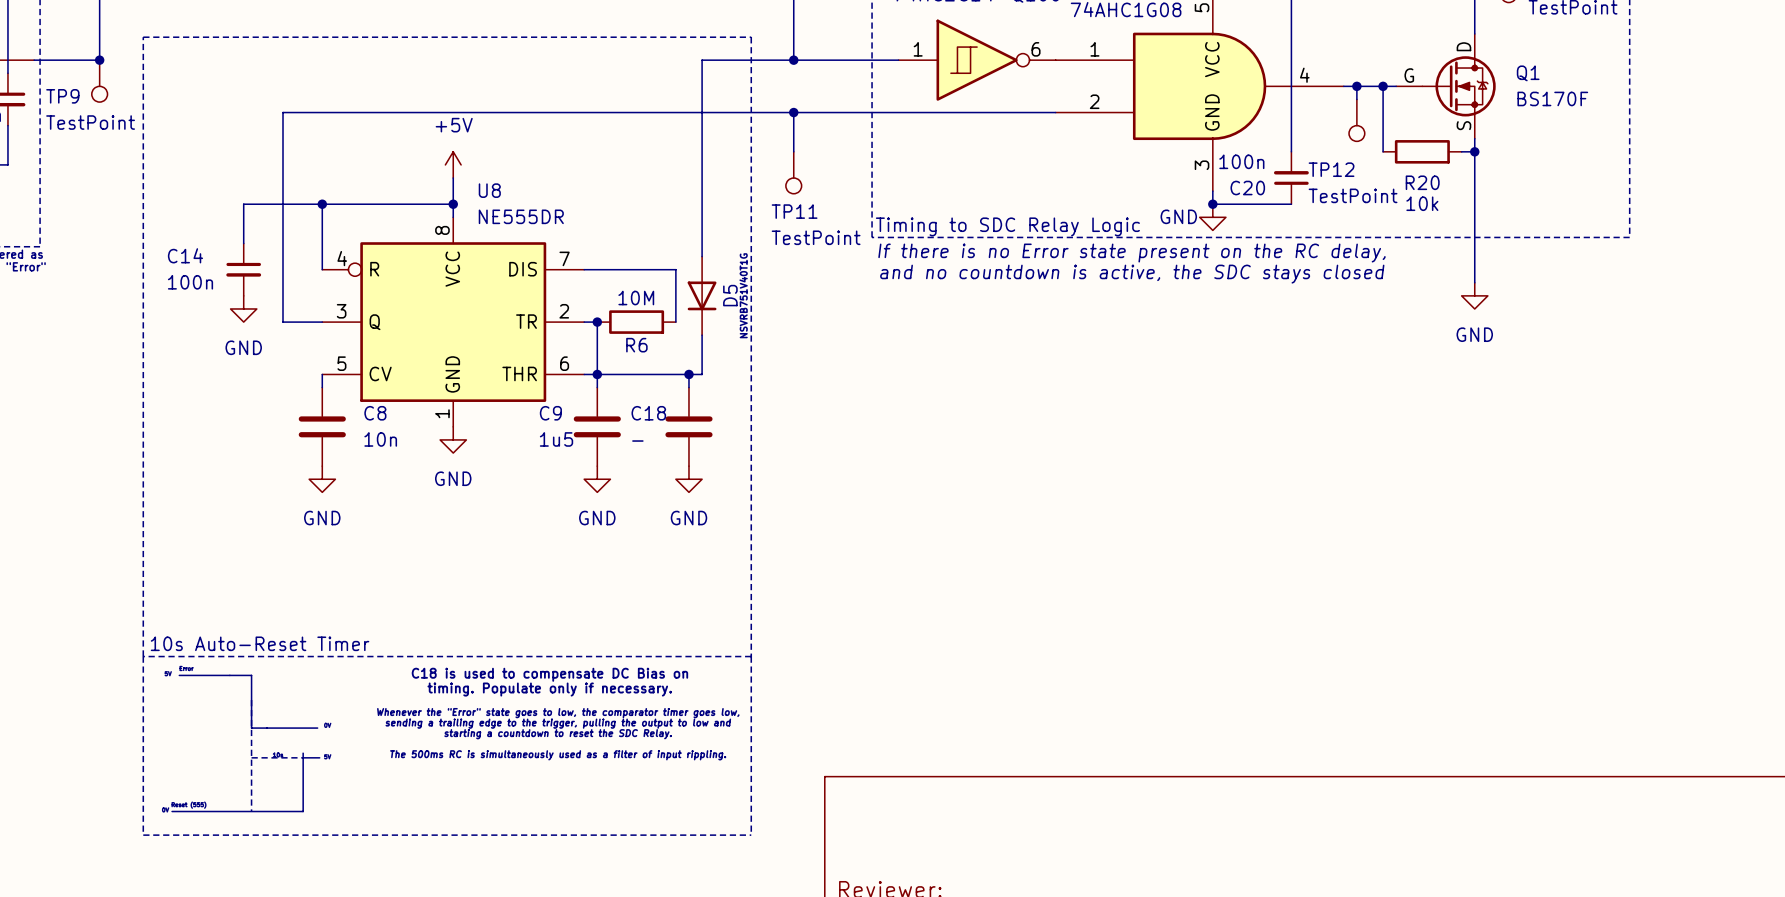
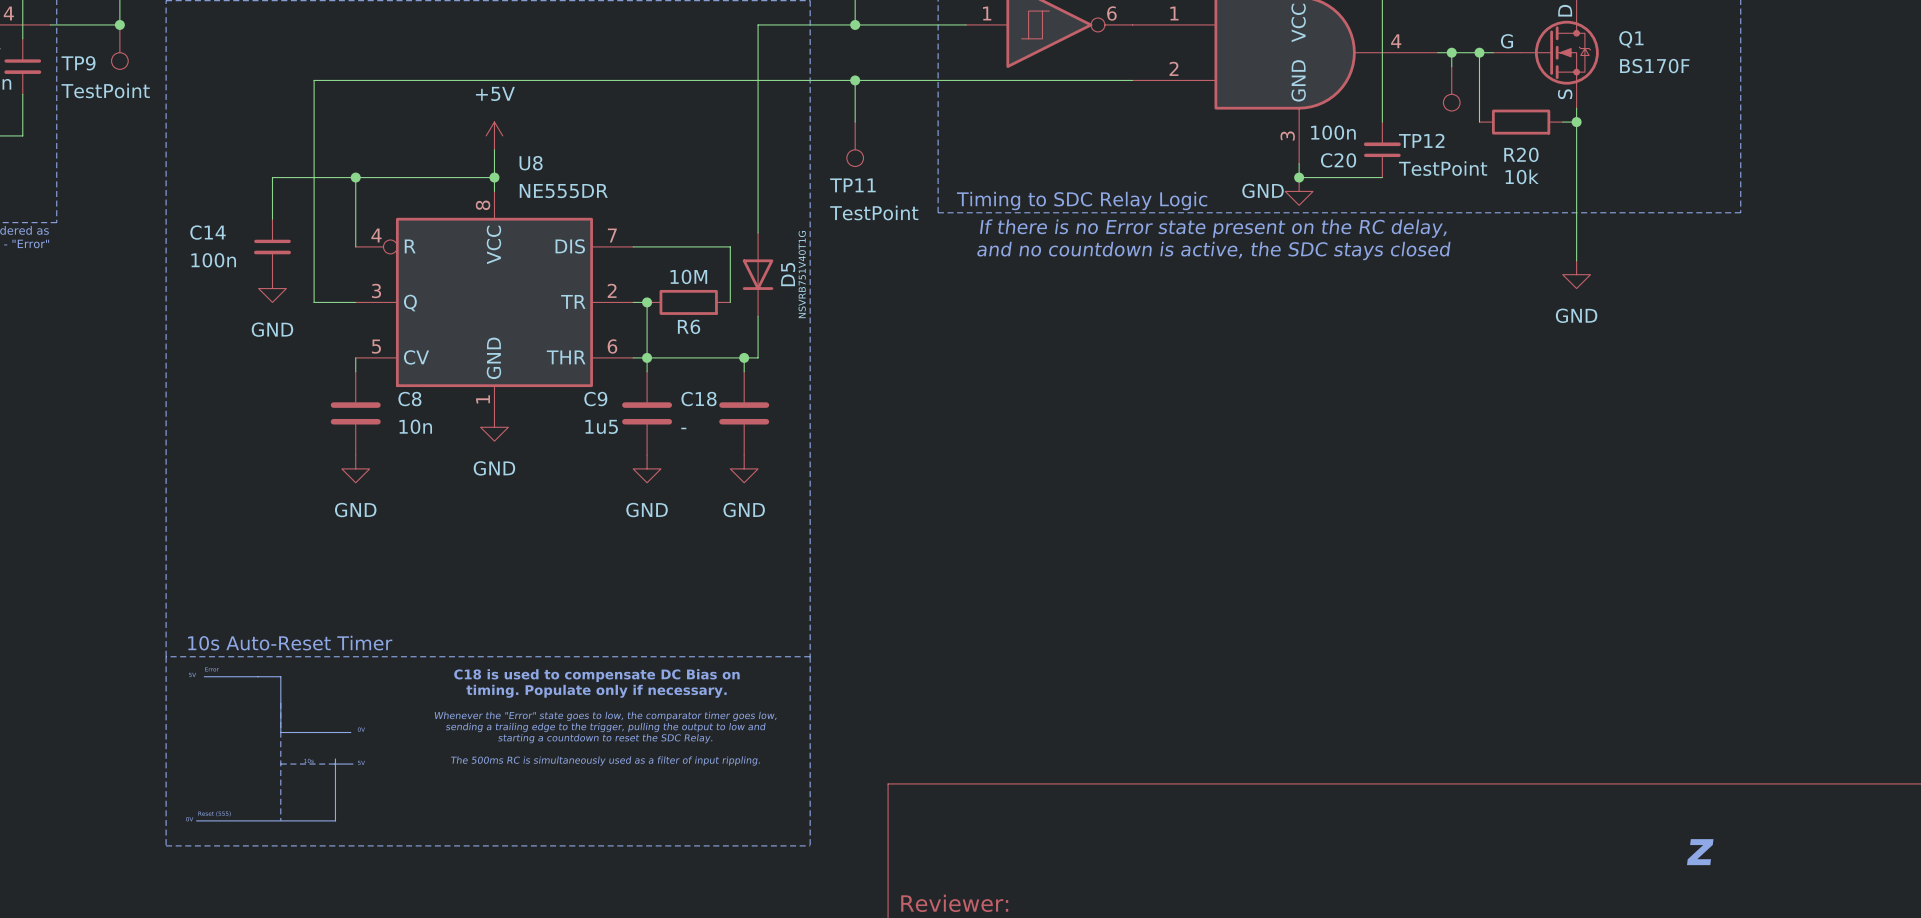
text: none -> z (1700, 852)

